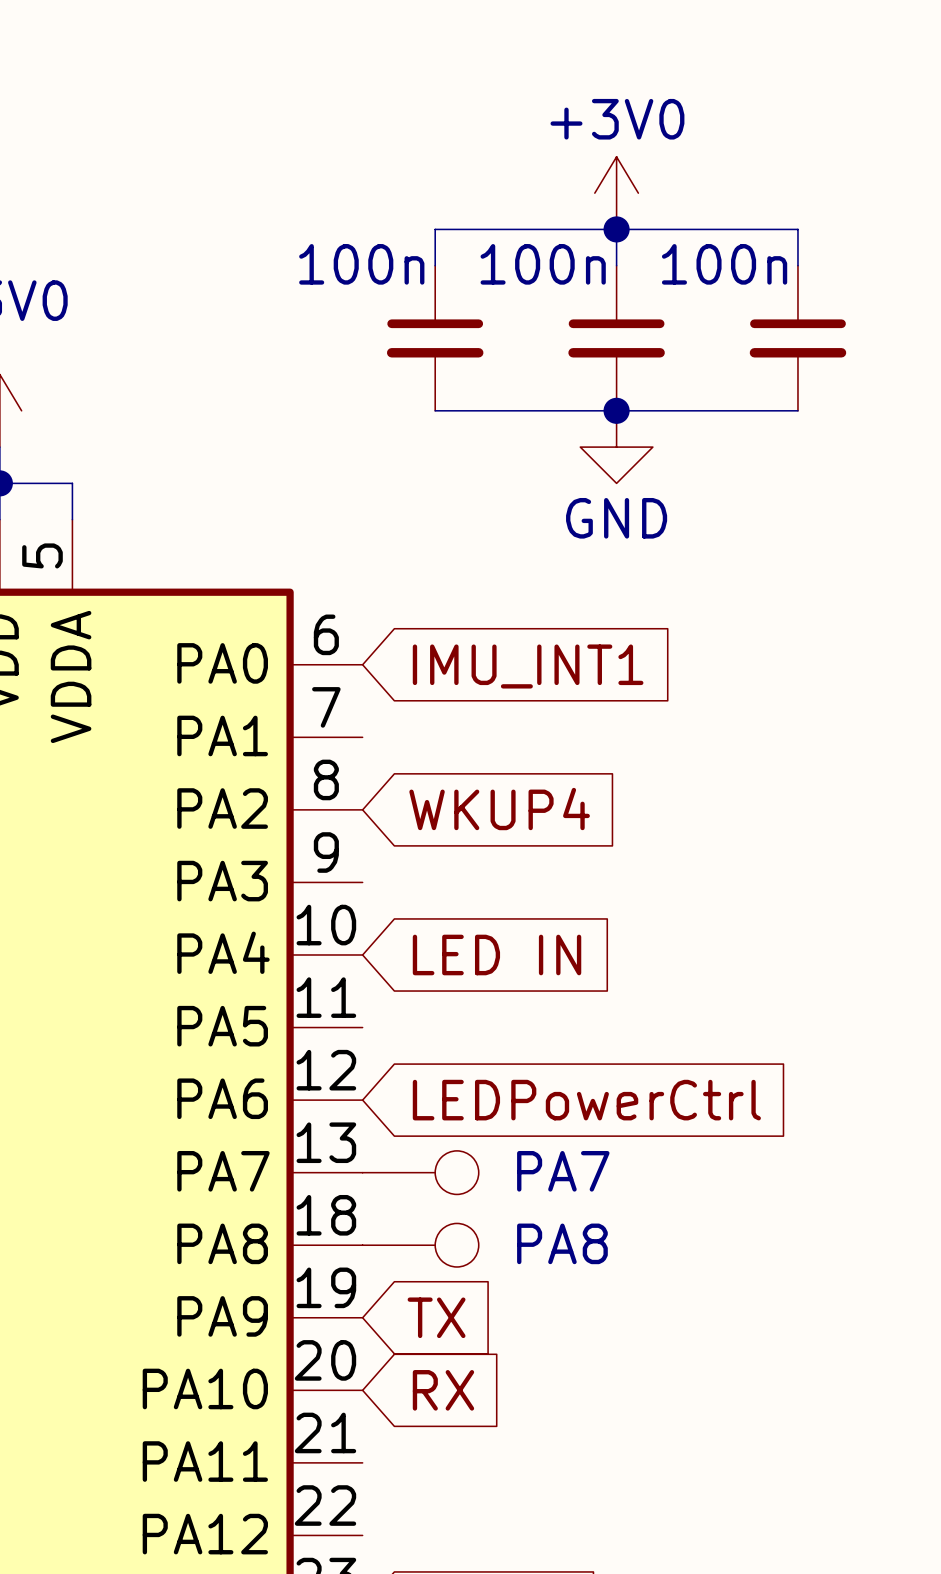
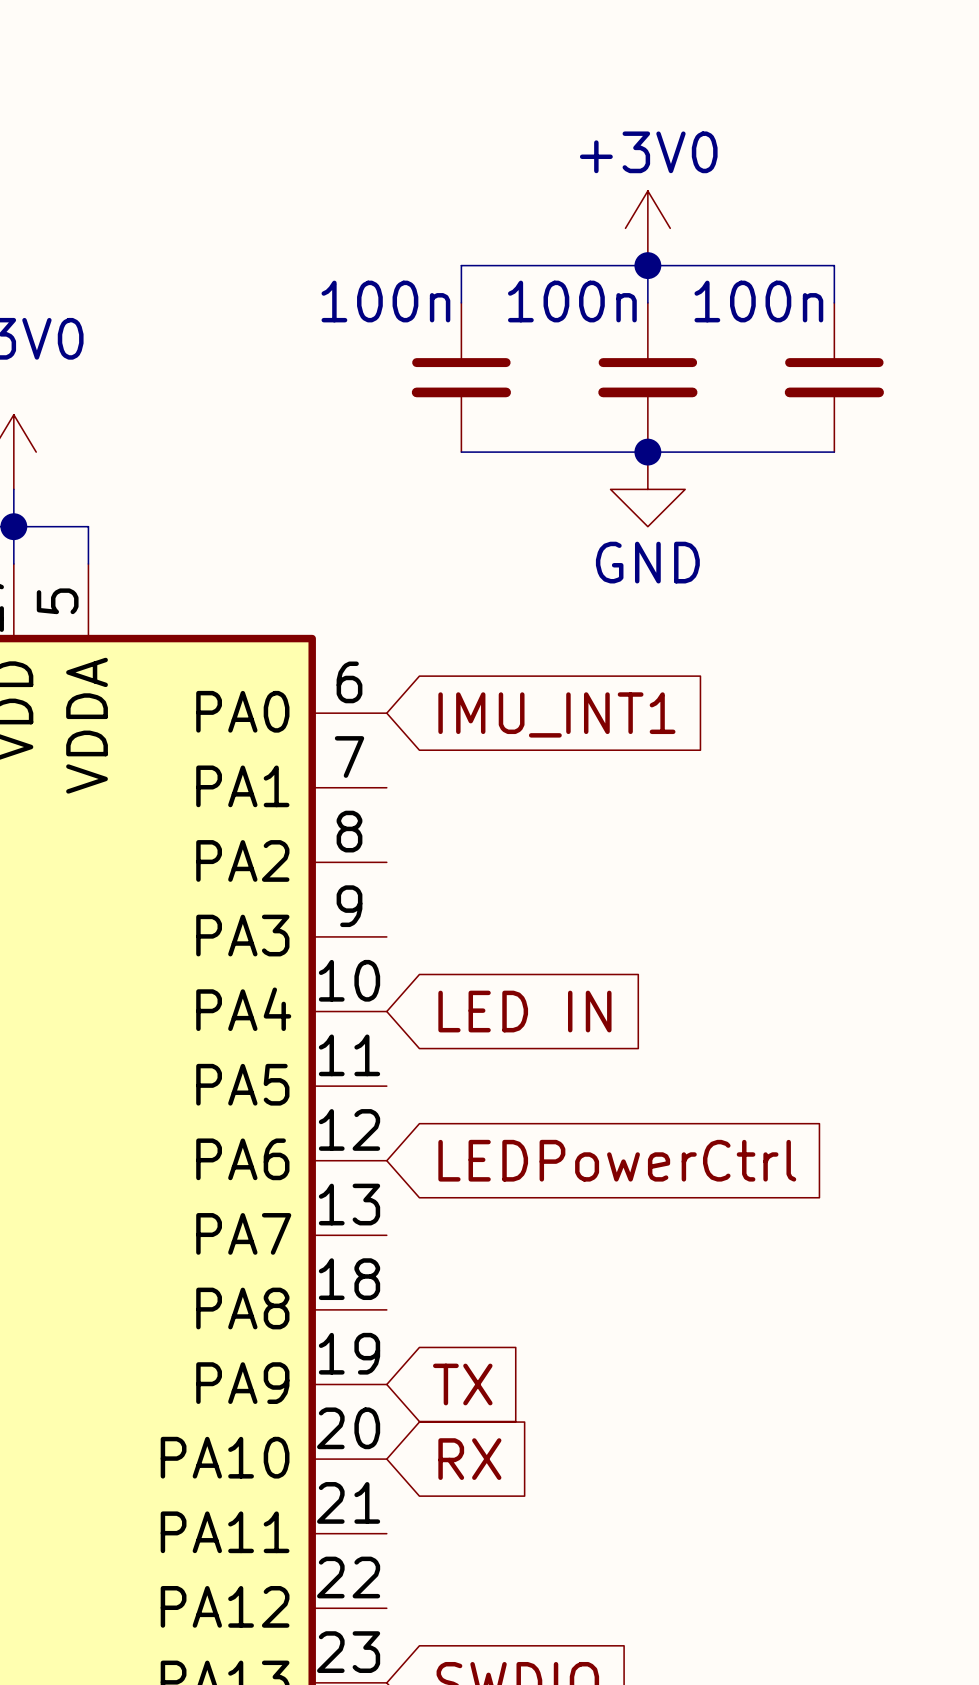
global label: WKUP4 (499, 809) -> none
part: PA7 (420, 1172) -> none
part: PA8 (420, 1245) -> none

